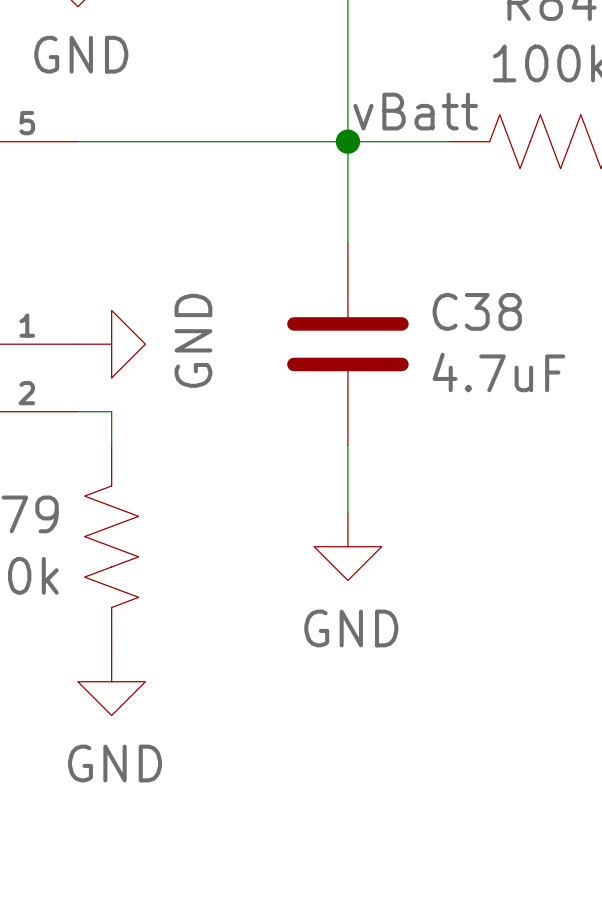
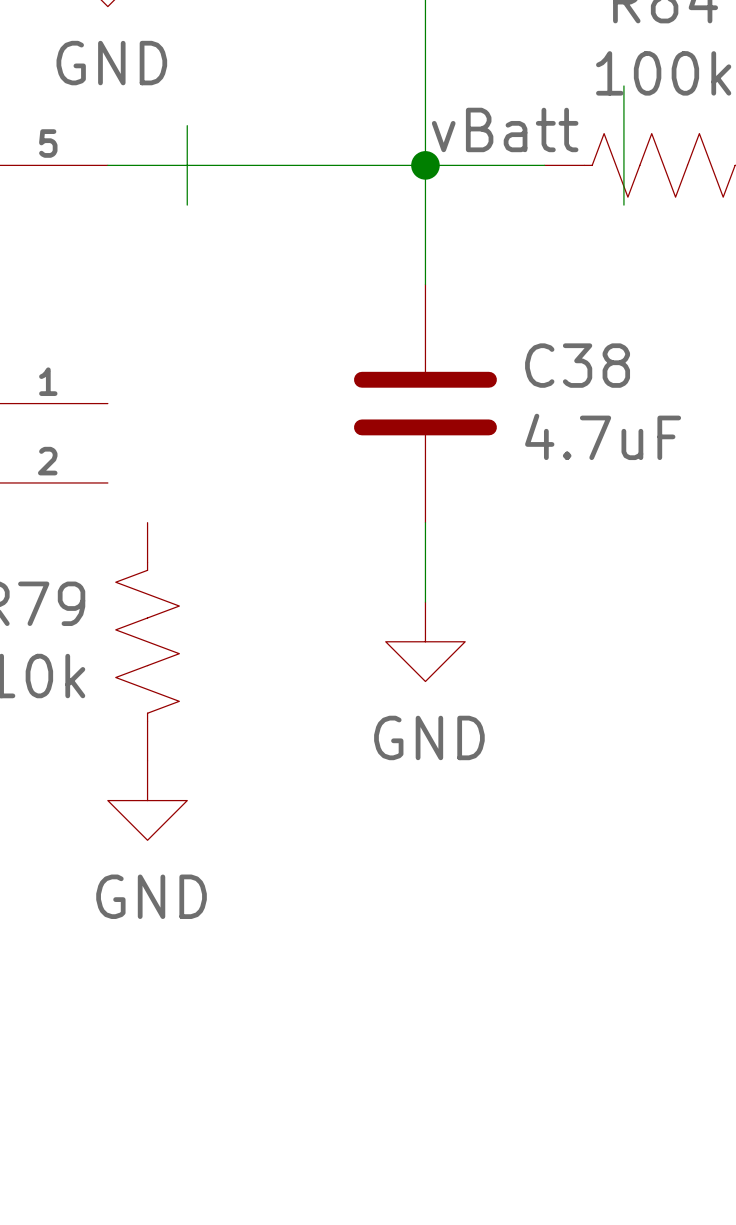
wire: none -> (623, 85) (623, 205)
wire: none -> (187, 125) (187, 205)
power symbol: GND (111, 344) -> none
wire: (77, 411) (111, 411) (111, 445) -> none

